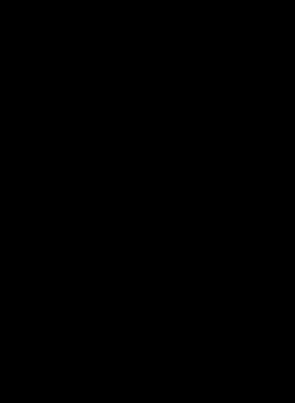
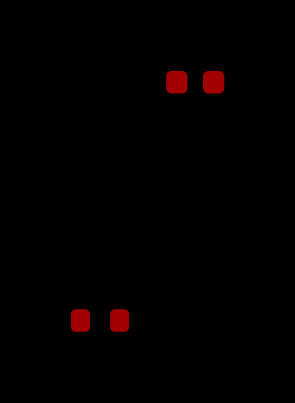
part: none -> (195, 82)
part: none -> (100, 320)

